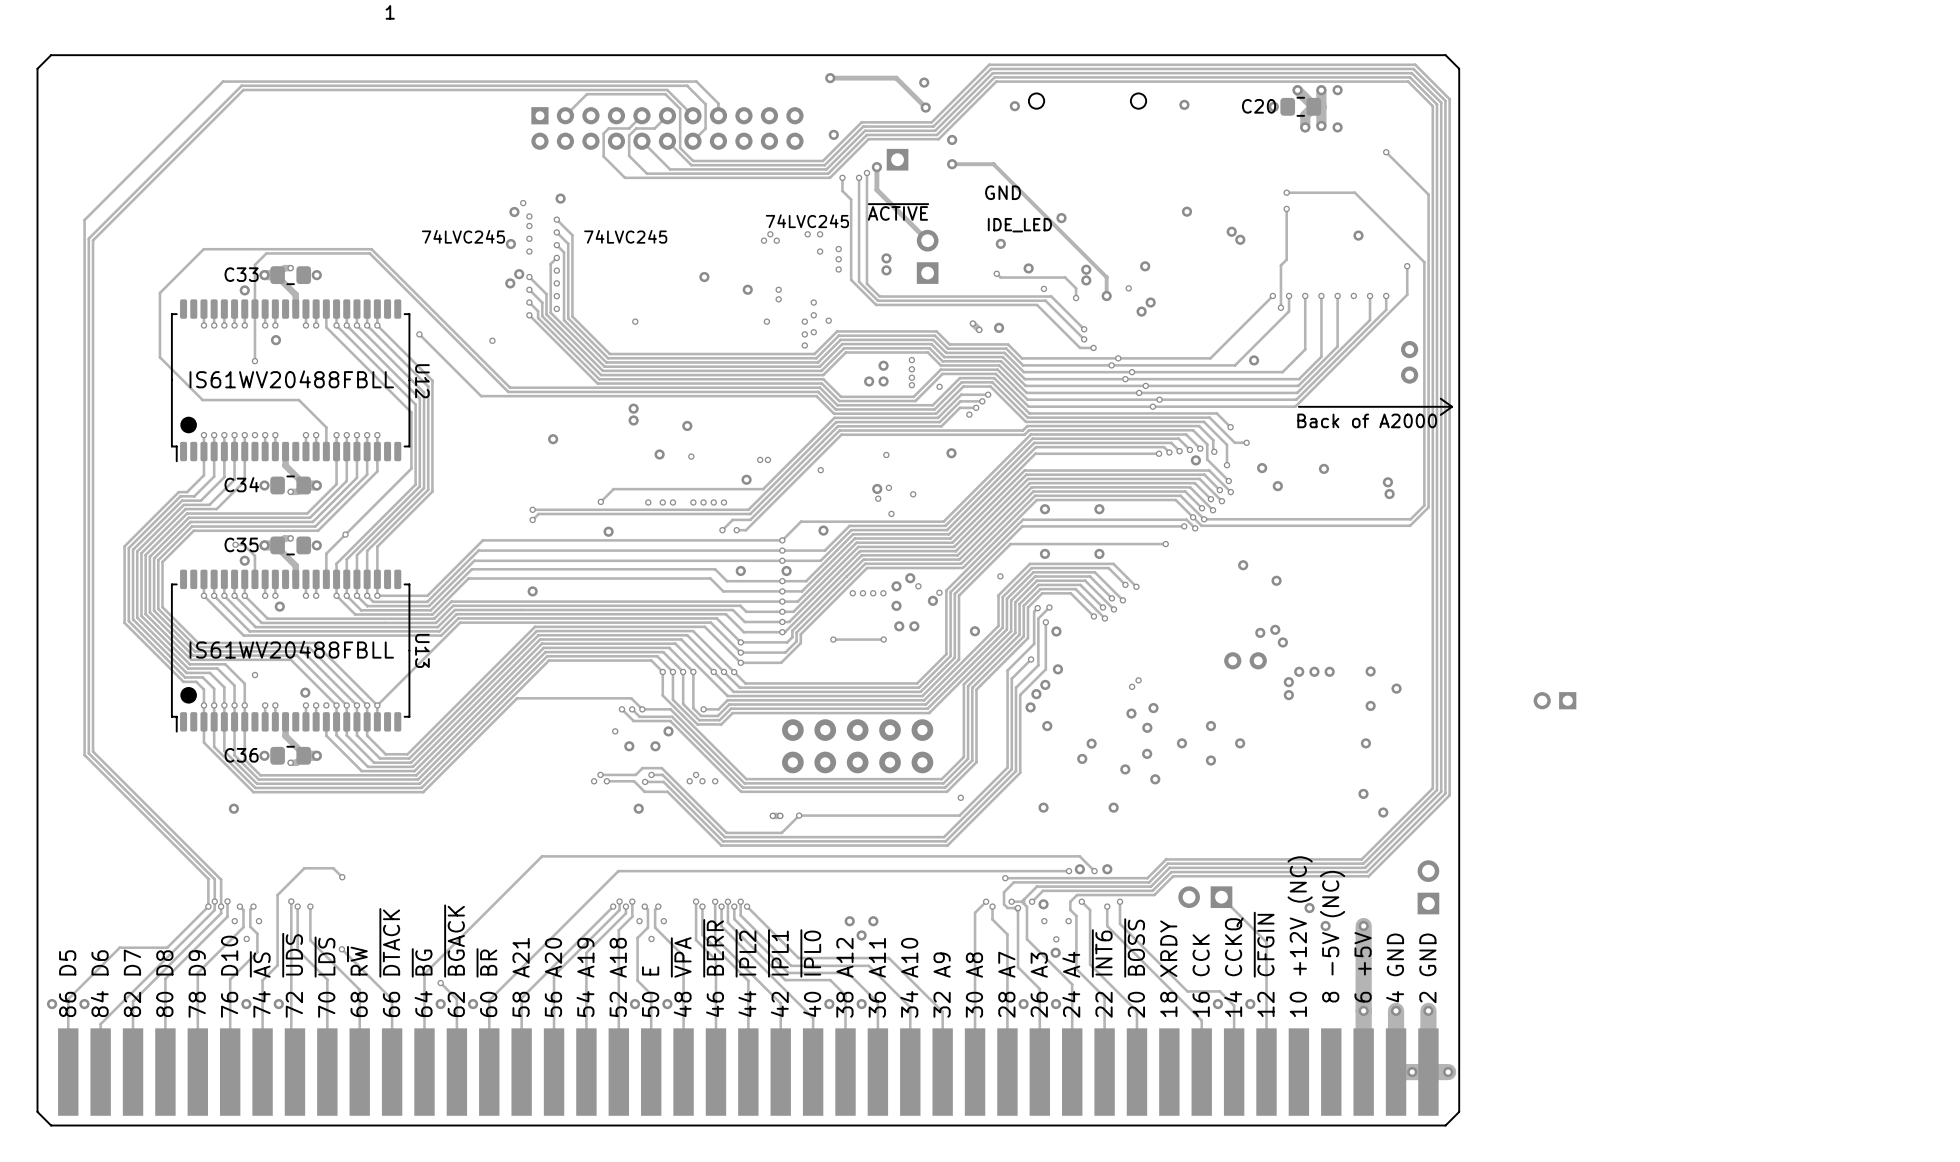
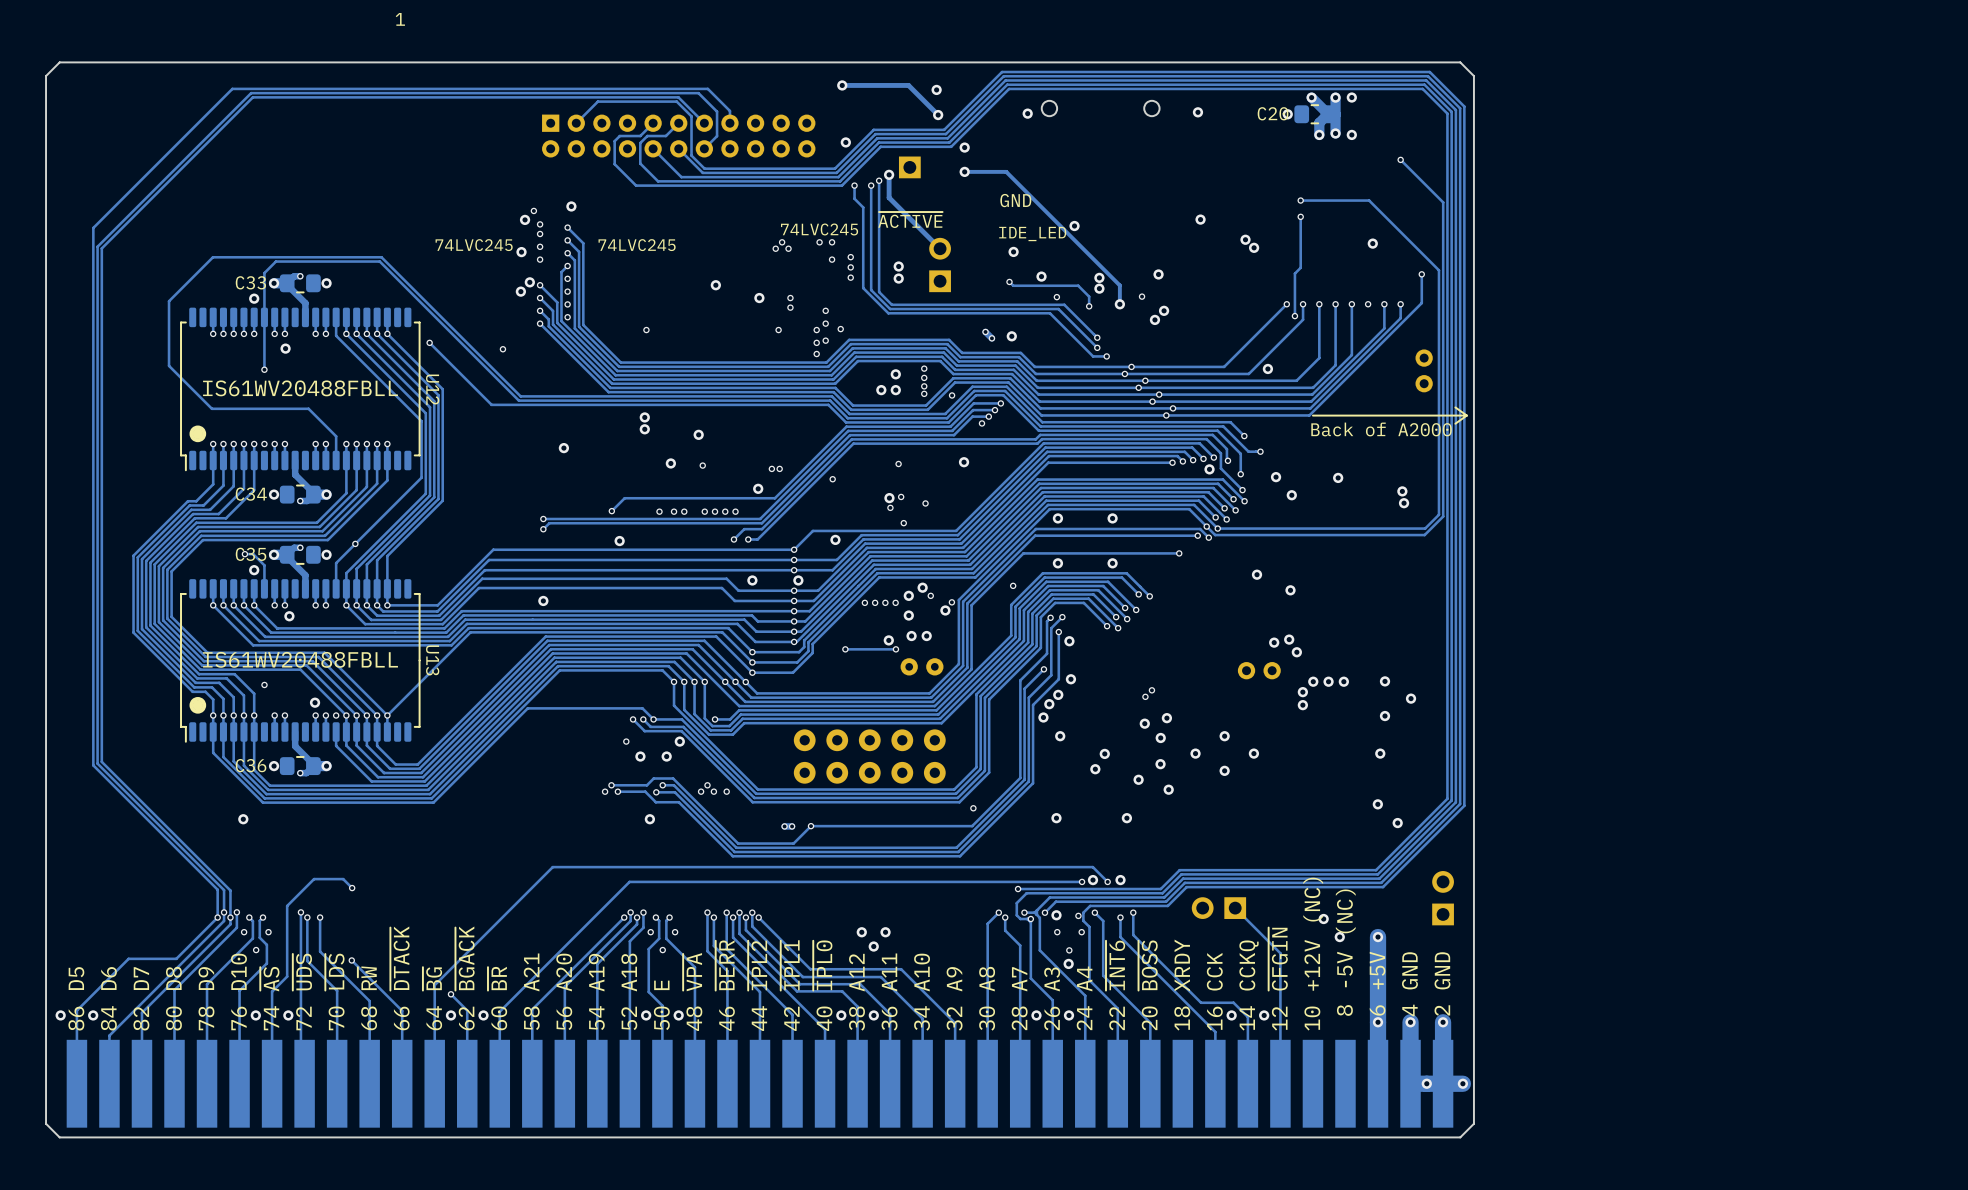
via: none -> (888, 640)
via: (974, 631) -> none
part: none -> (922, 666)
part: (1554, 700) -> none
via: none -> (1078, 915)

